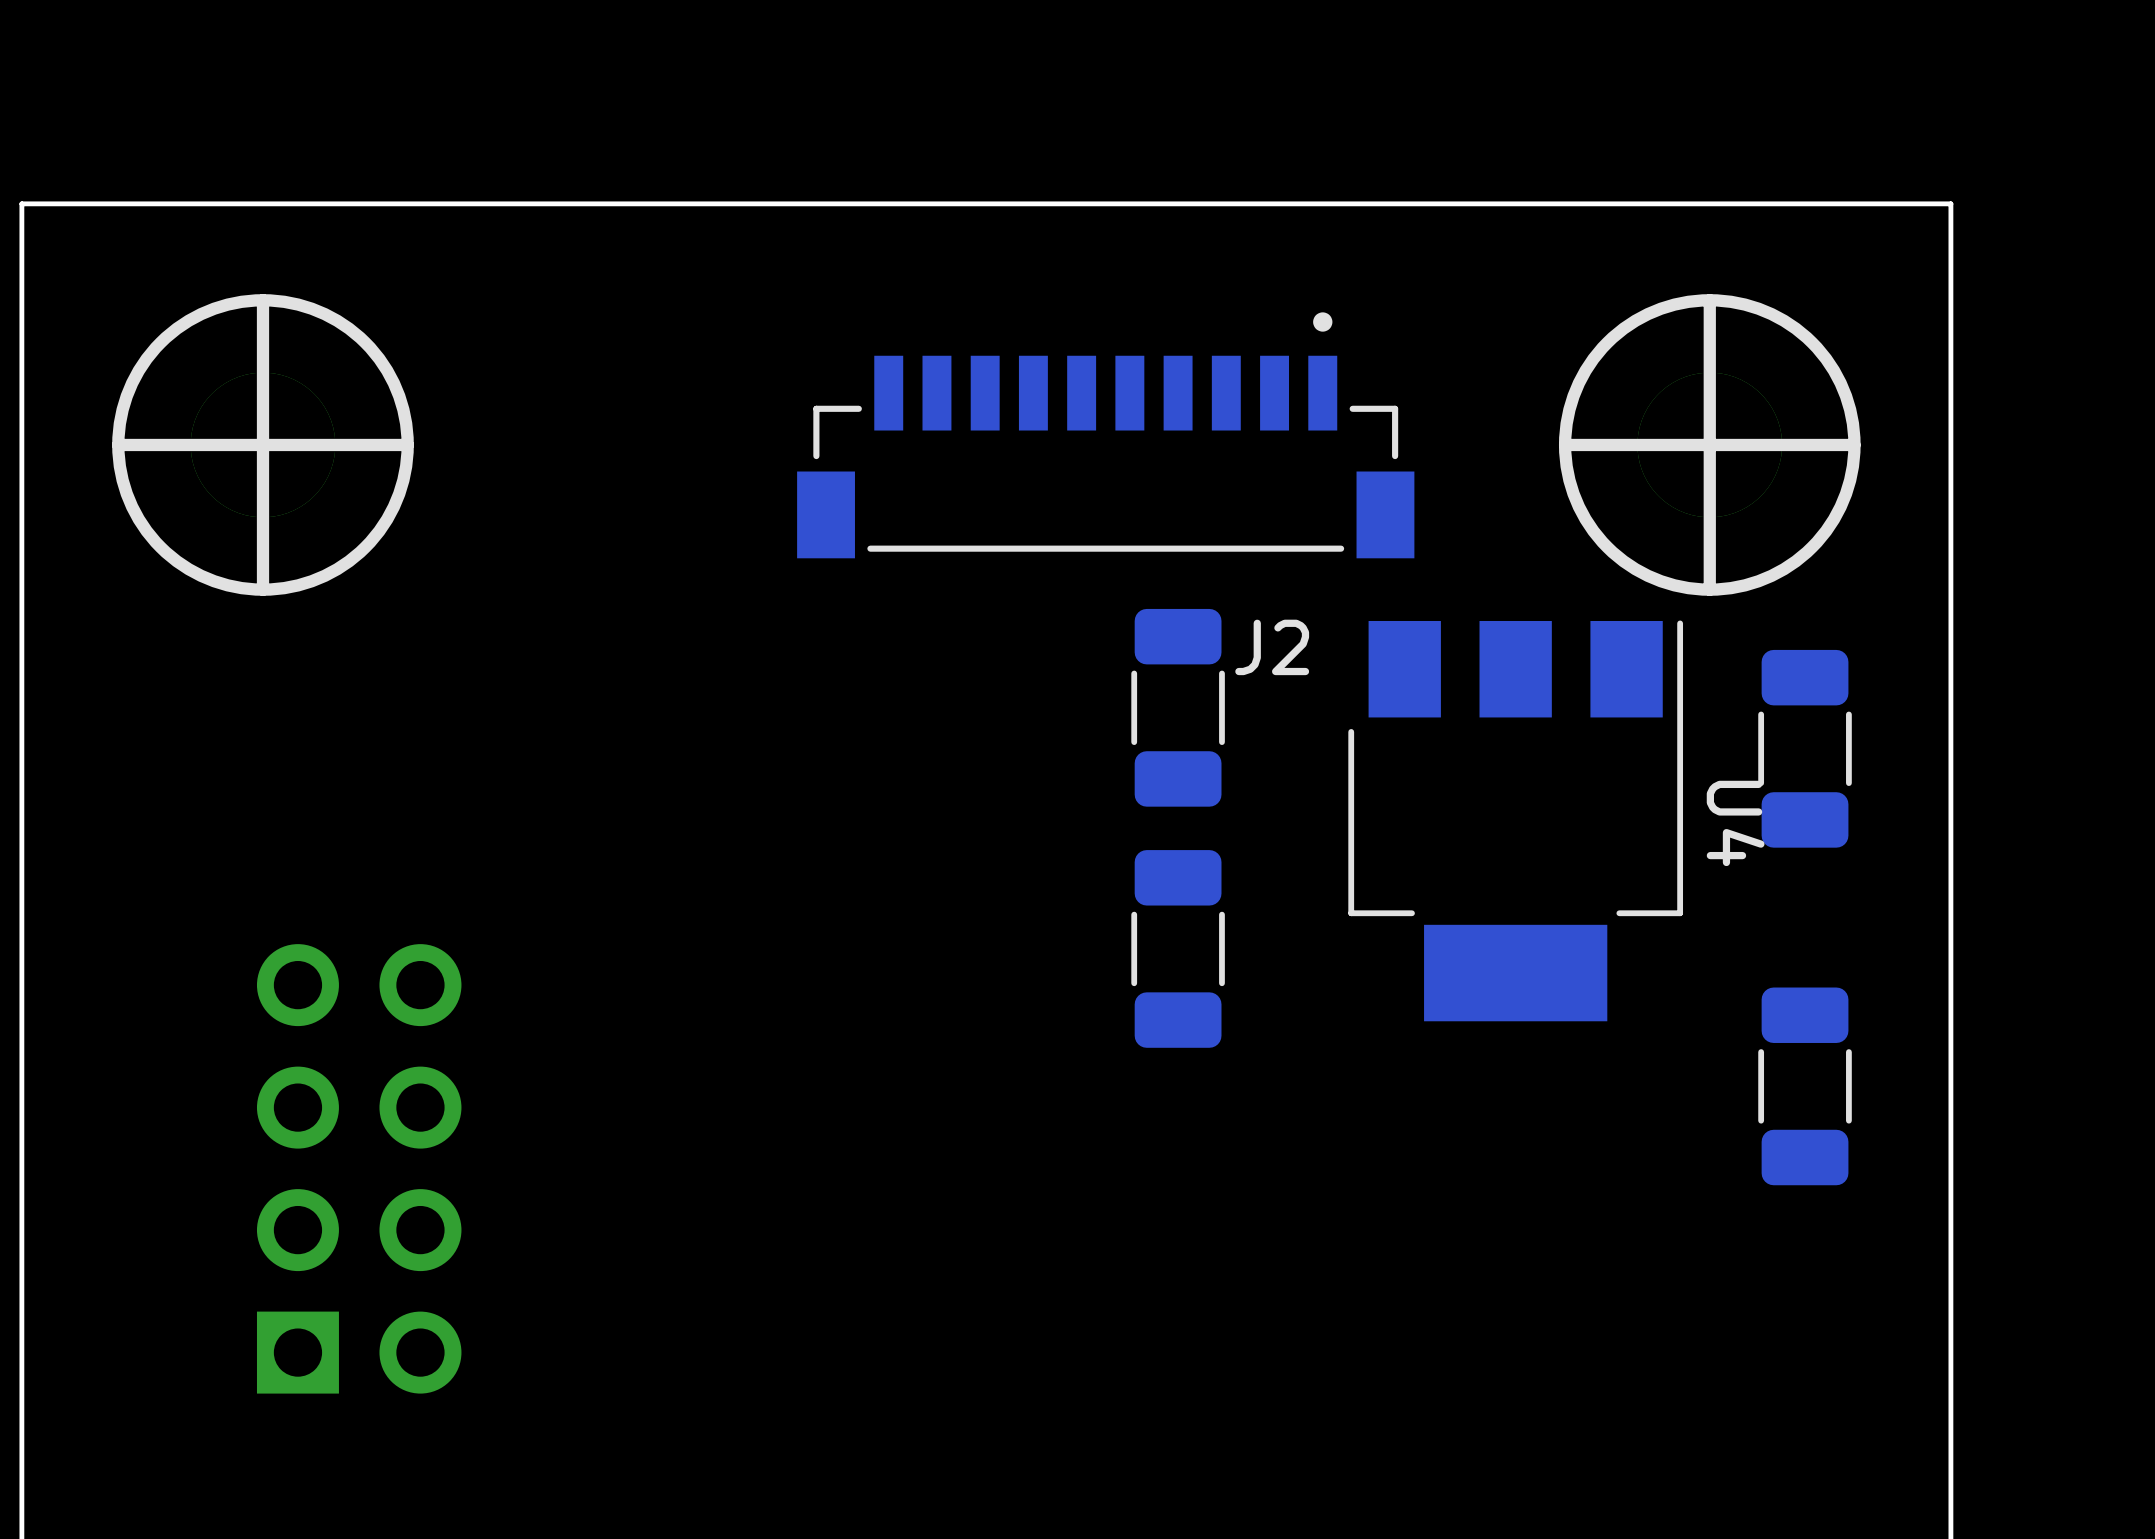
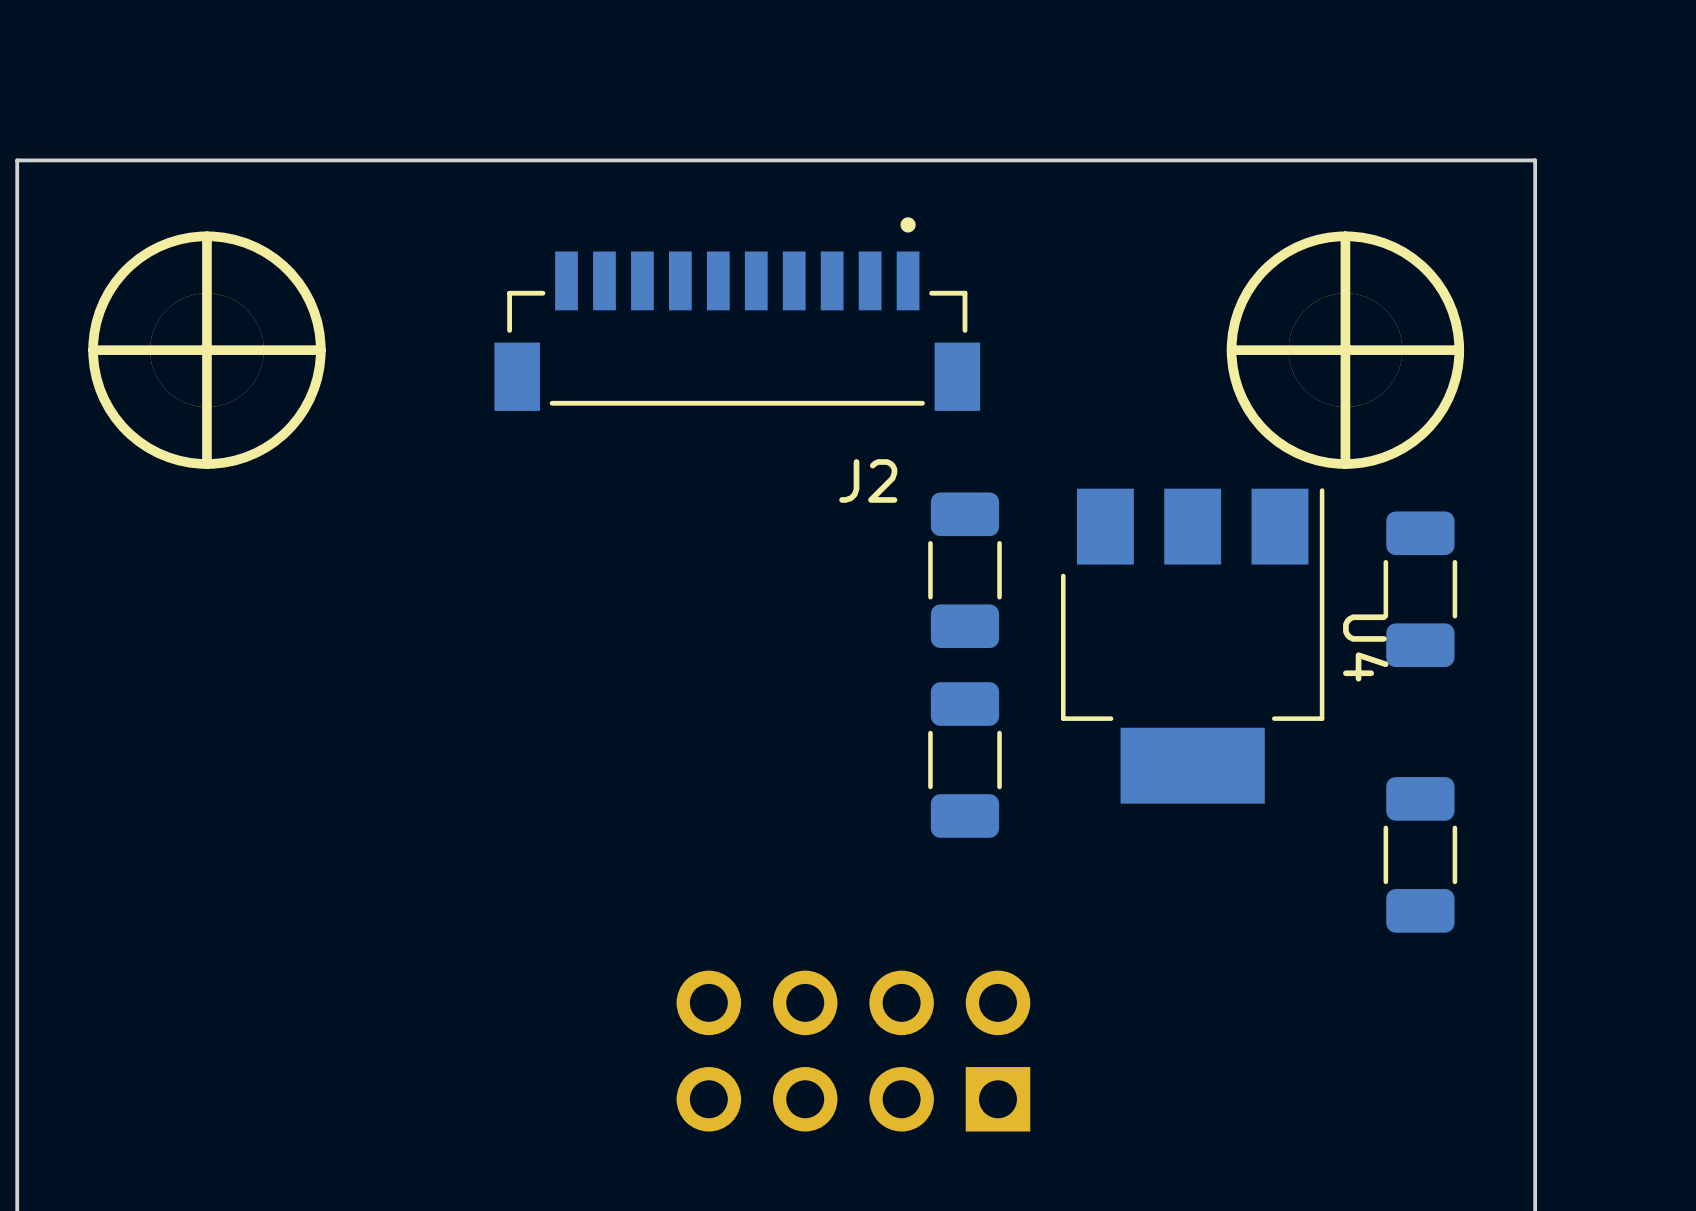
J2 position: (1105, 435) -> (737, 314)
part position: (1178, 707) -> (964, 570)
part position: (1178, 948) -> (964, 760)
part rotation: 0° (359, 1168) -> 90° counterclockwise (853, 1051)
part position: (359, 1168) -> (853, 1051)

